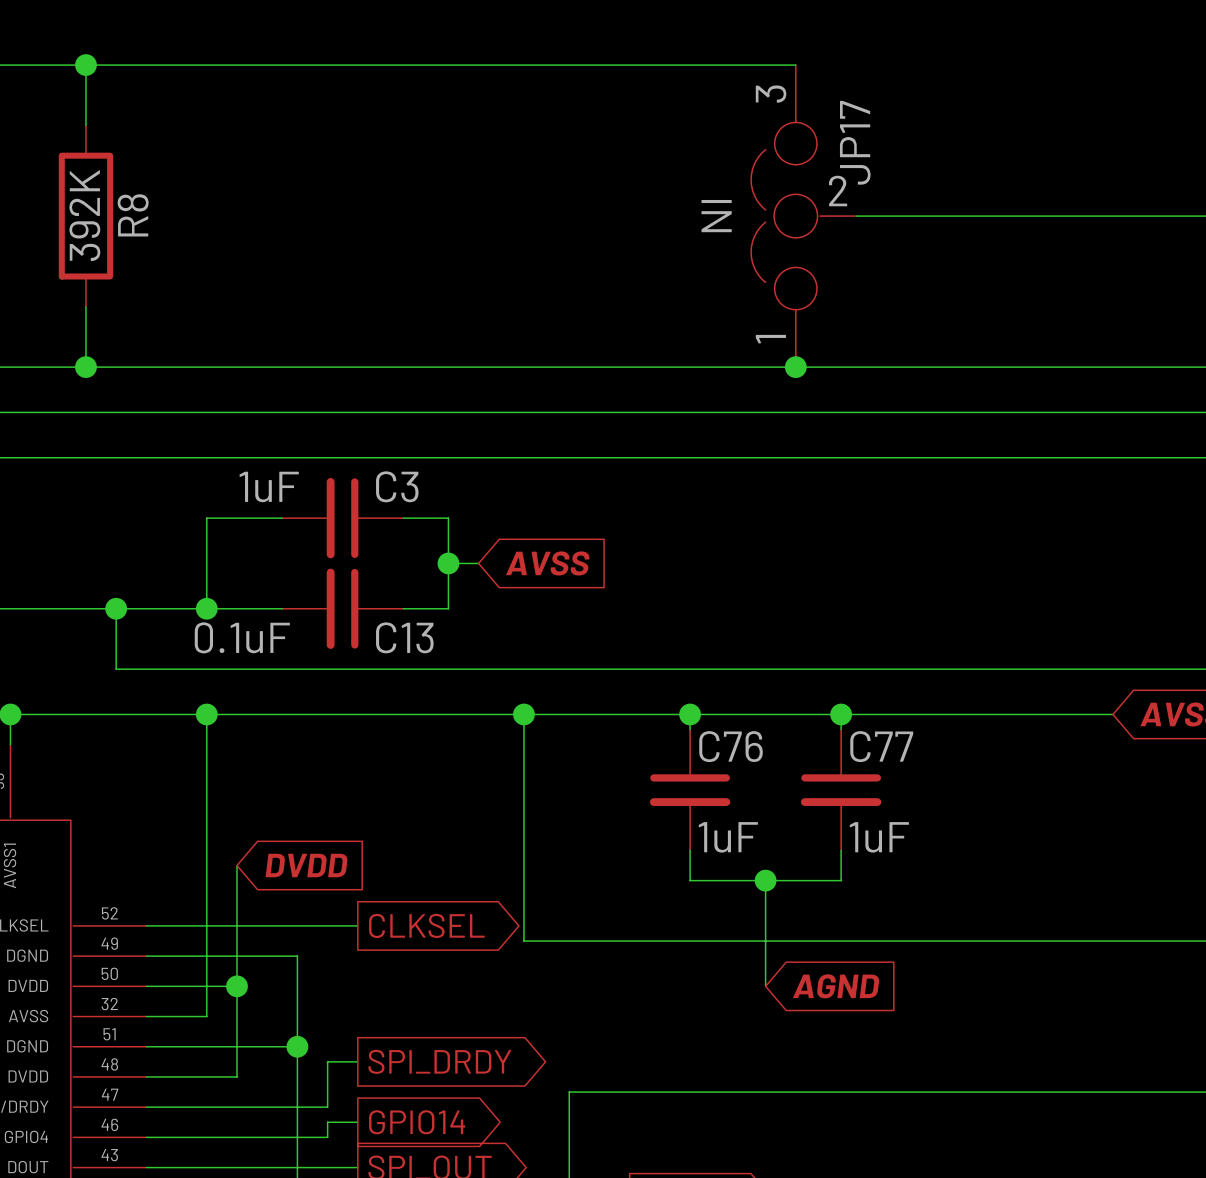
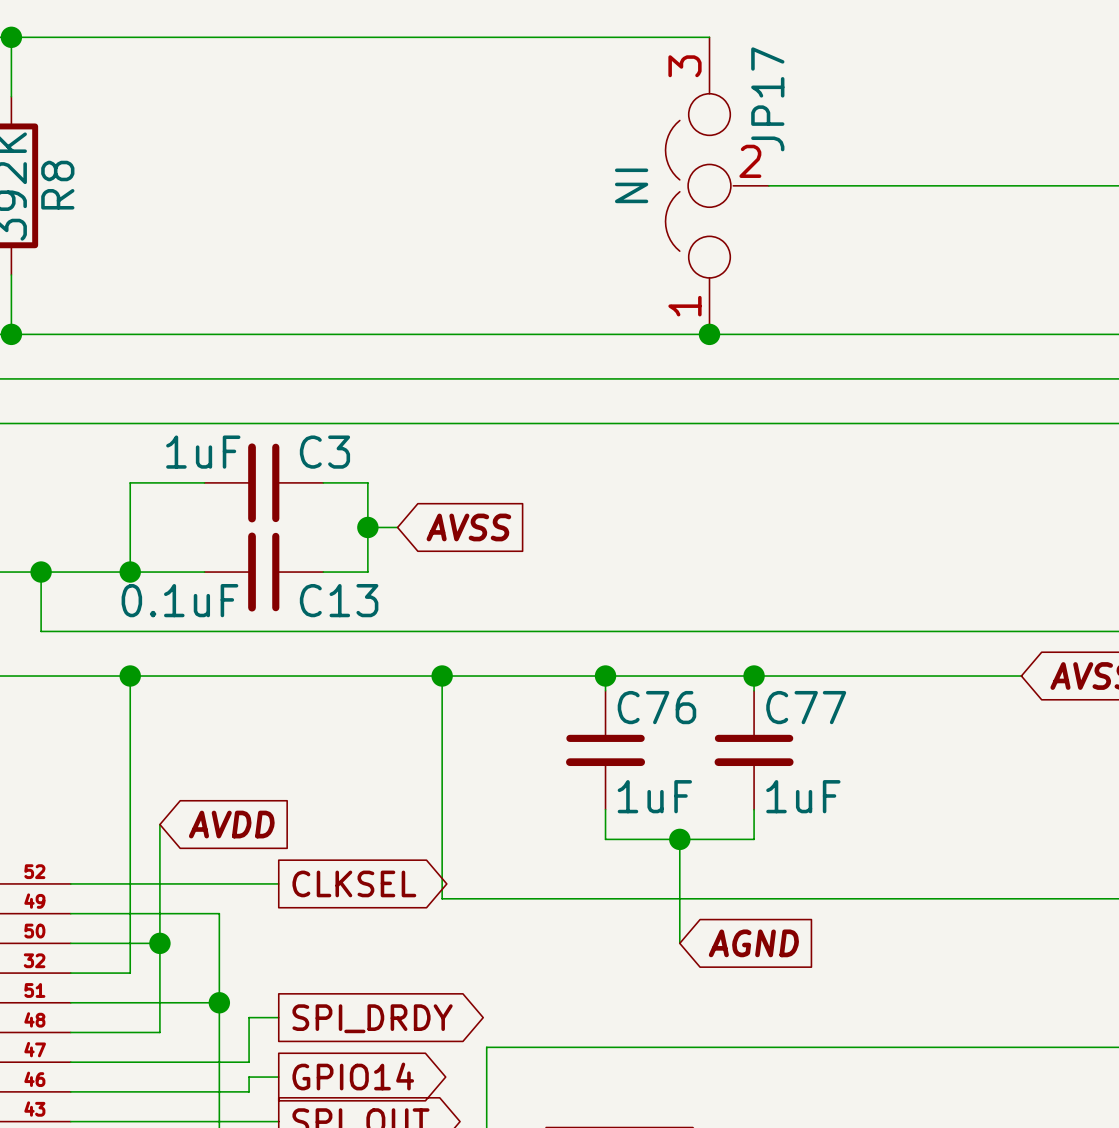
global label: DVDD (306, 865) -> AVDD (231, 824)

